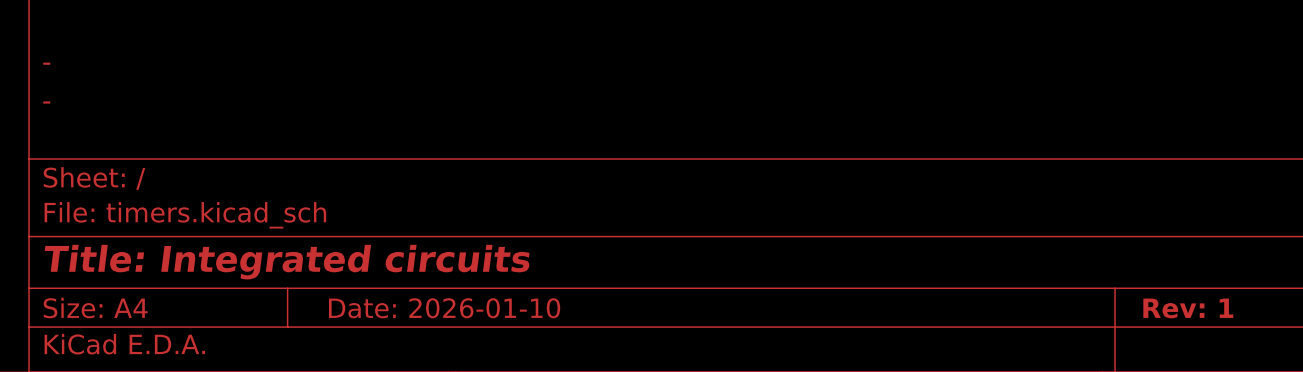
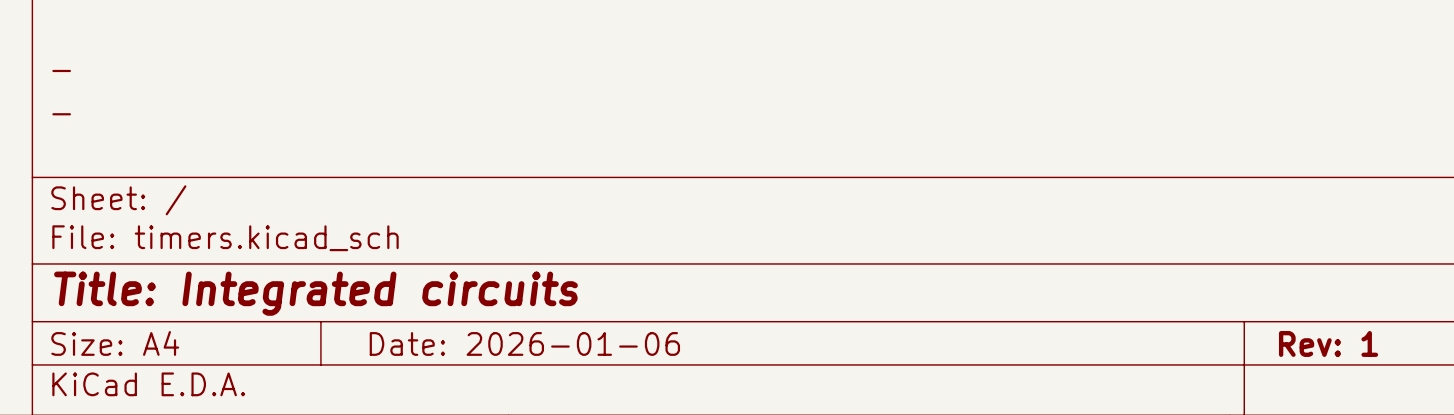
title block: Date: 2026-01-10 (444, 308) -> Date: 2026-01-06 (524, 343)

